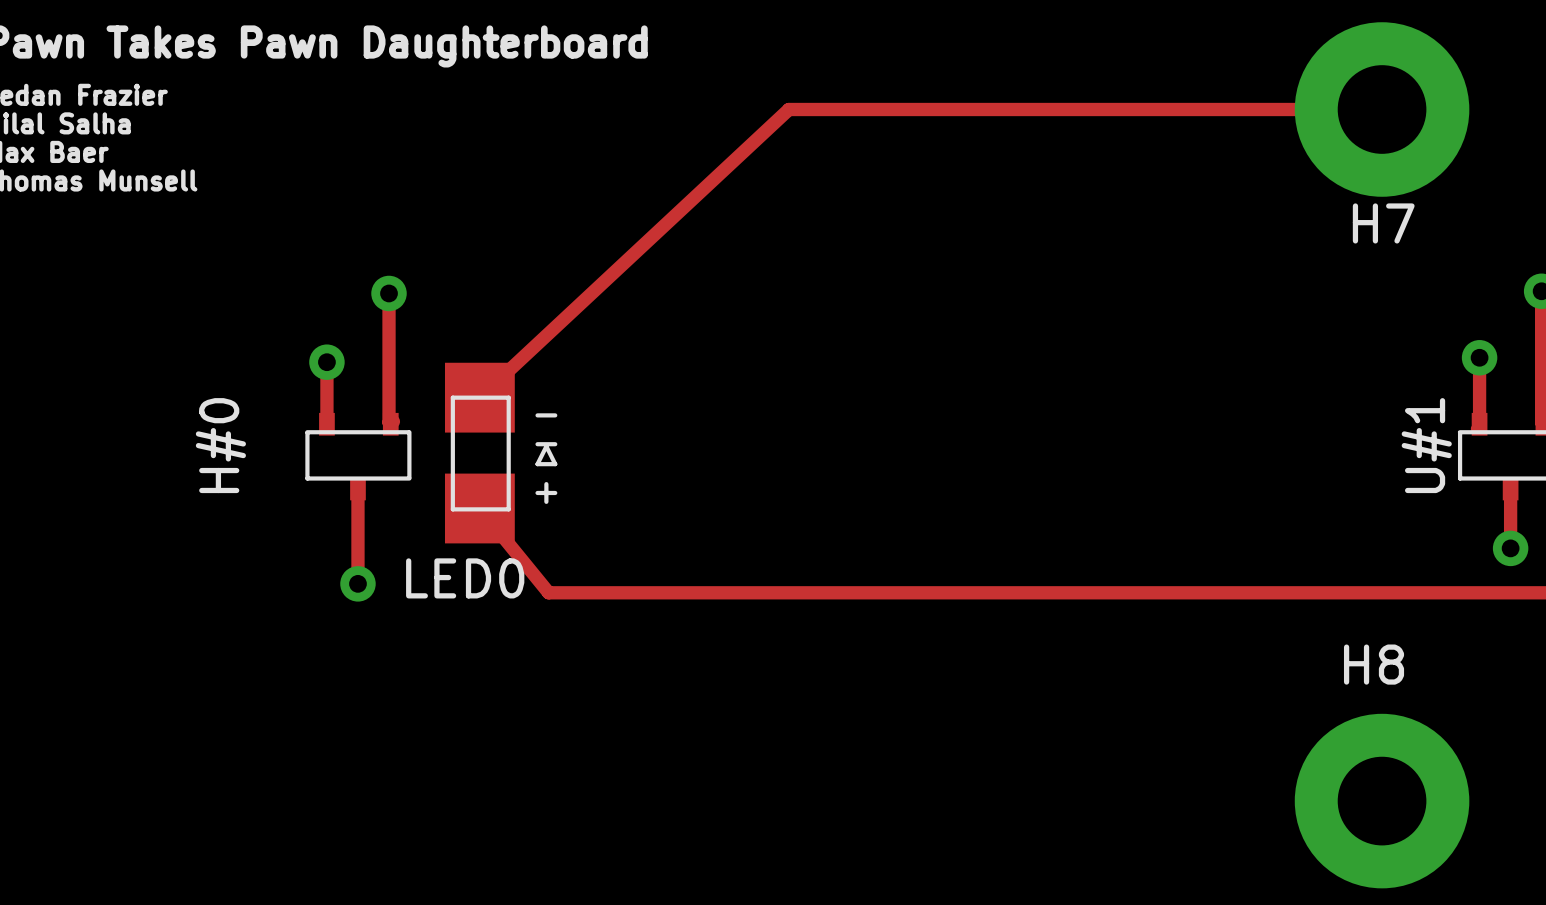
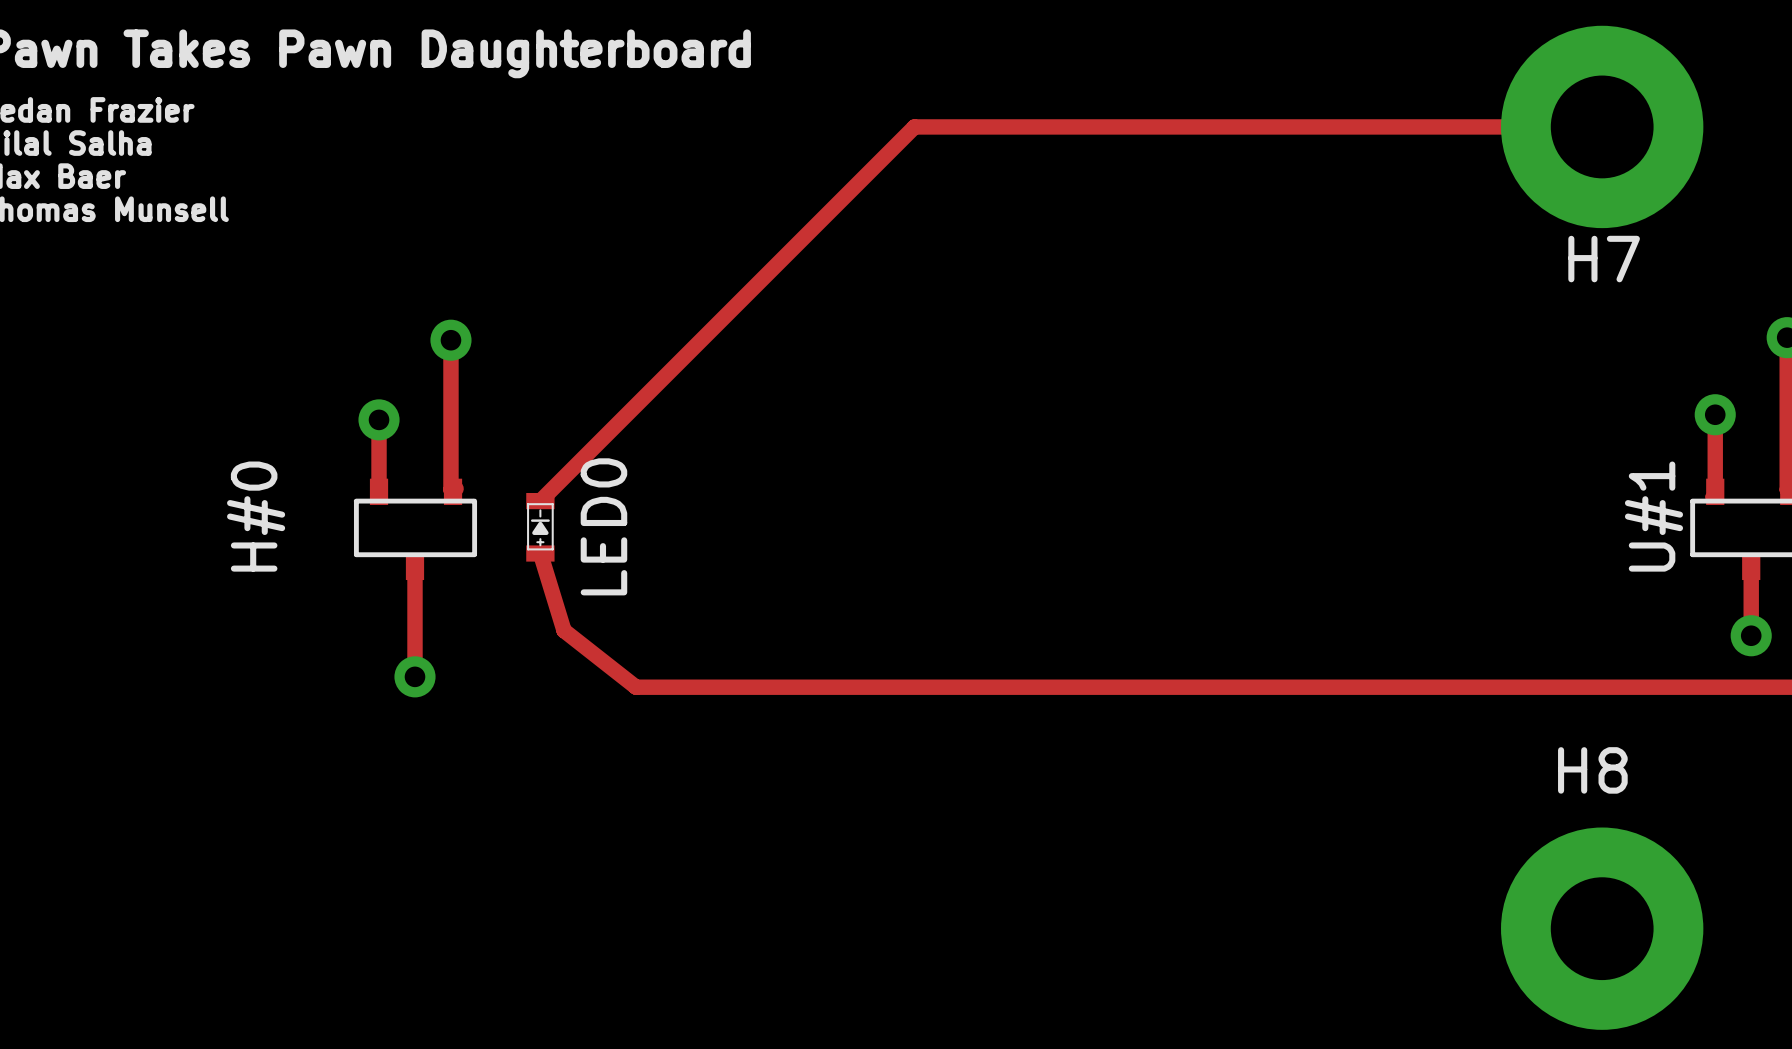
track: (788, 109) (479, 397) -> (914, 126) (540, 501) (538, 499)
LED0 footprint: [444, 362, 558, 544] -> [526, 492, 555, 562]
track: (479, 508) (548, 592) -> (540, 553) (564, 630) (636, 687)
LED0 name position: LED0 (465, 578) -> LED0 (603, 526)

